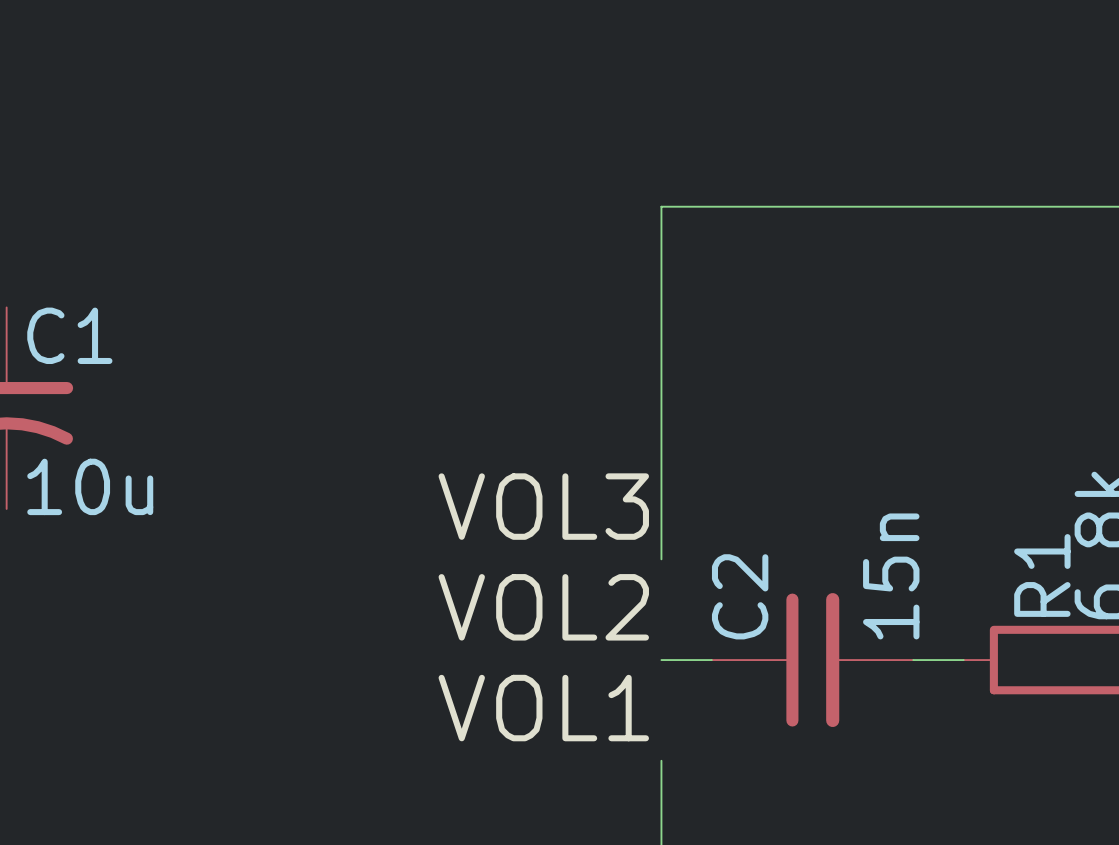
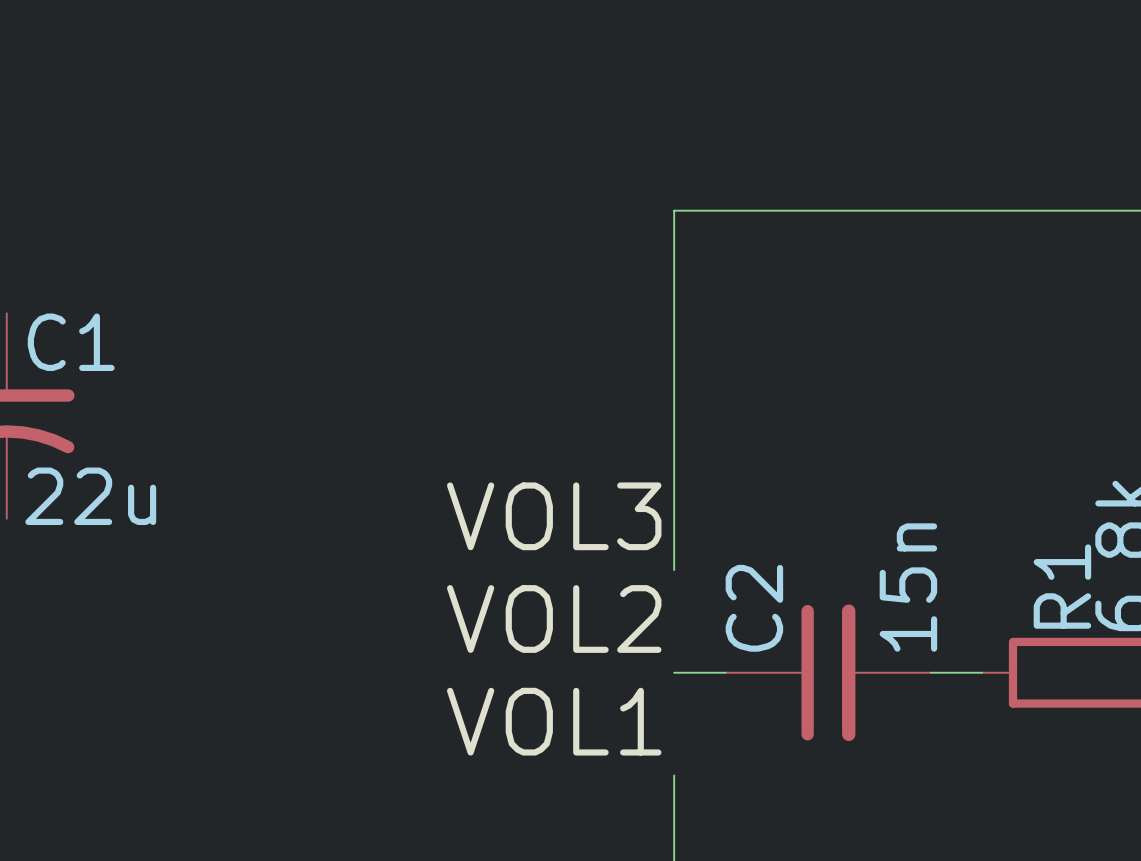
C1 value: 10u (90, 486) -> 22u (90, 496)

